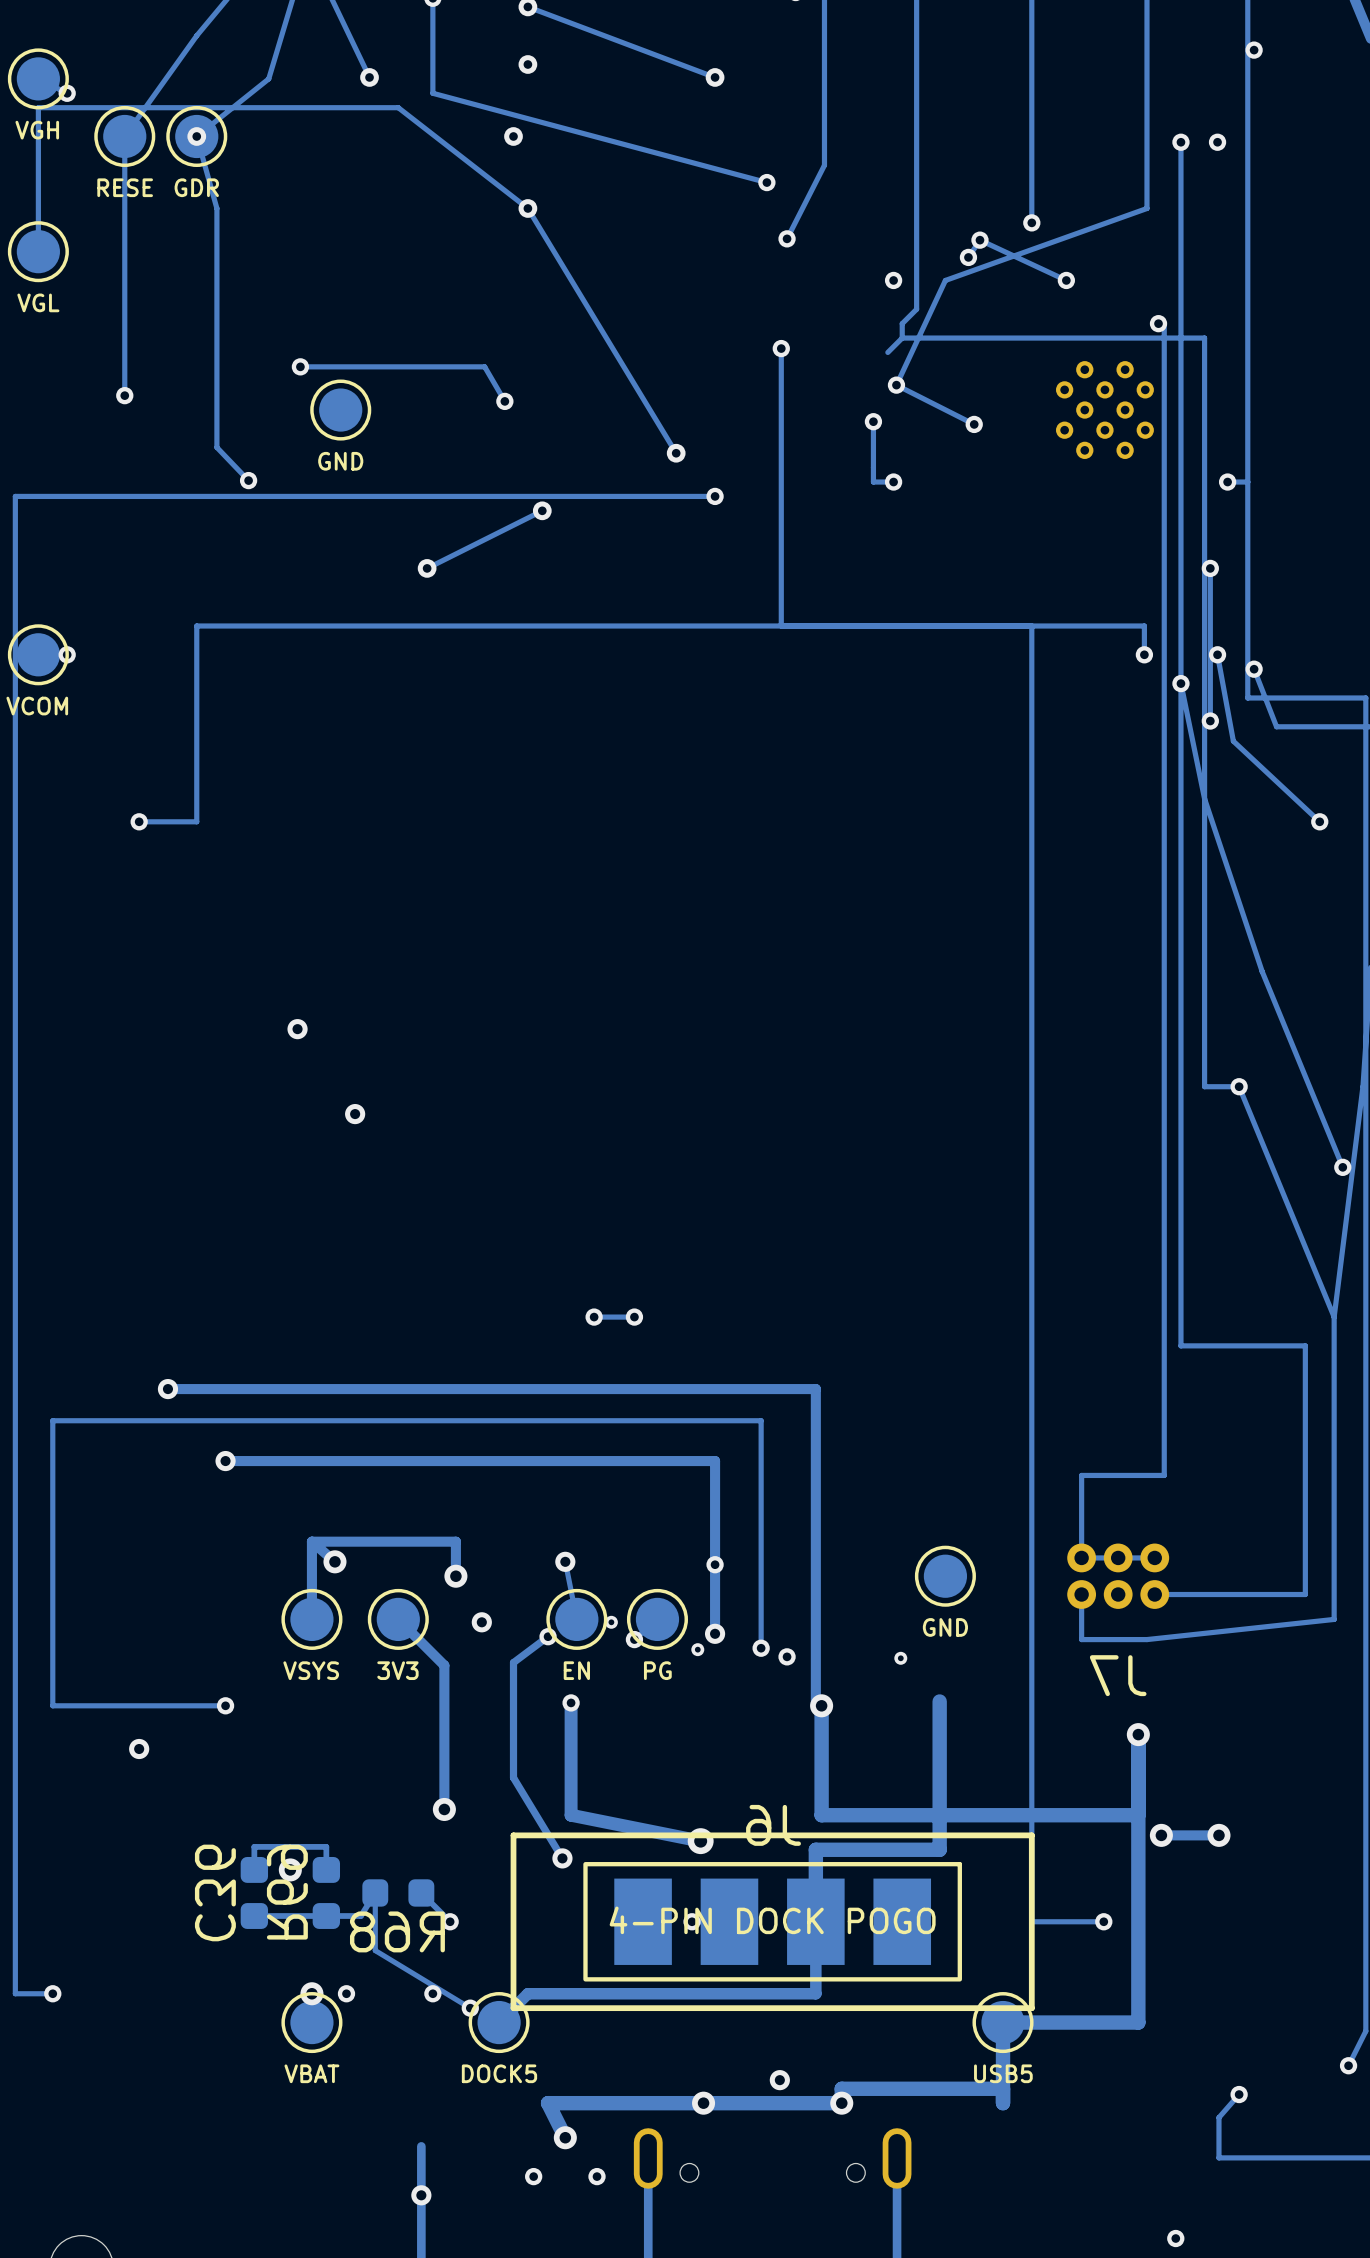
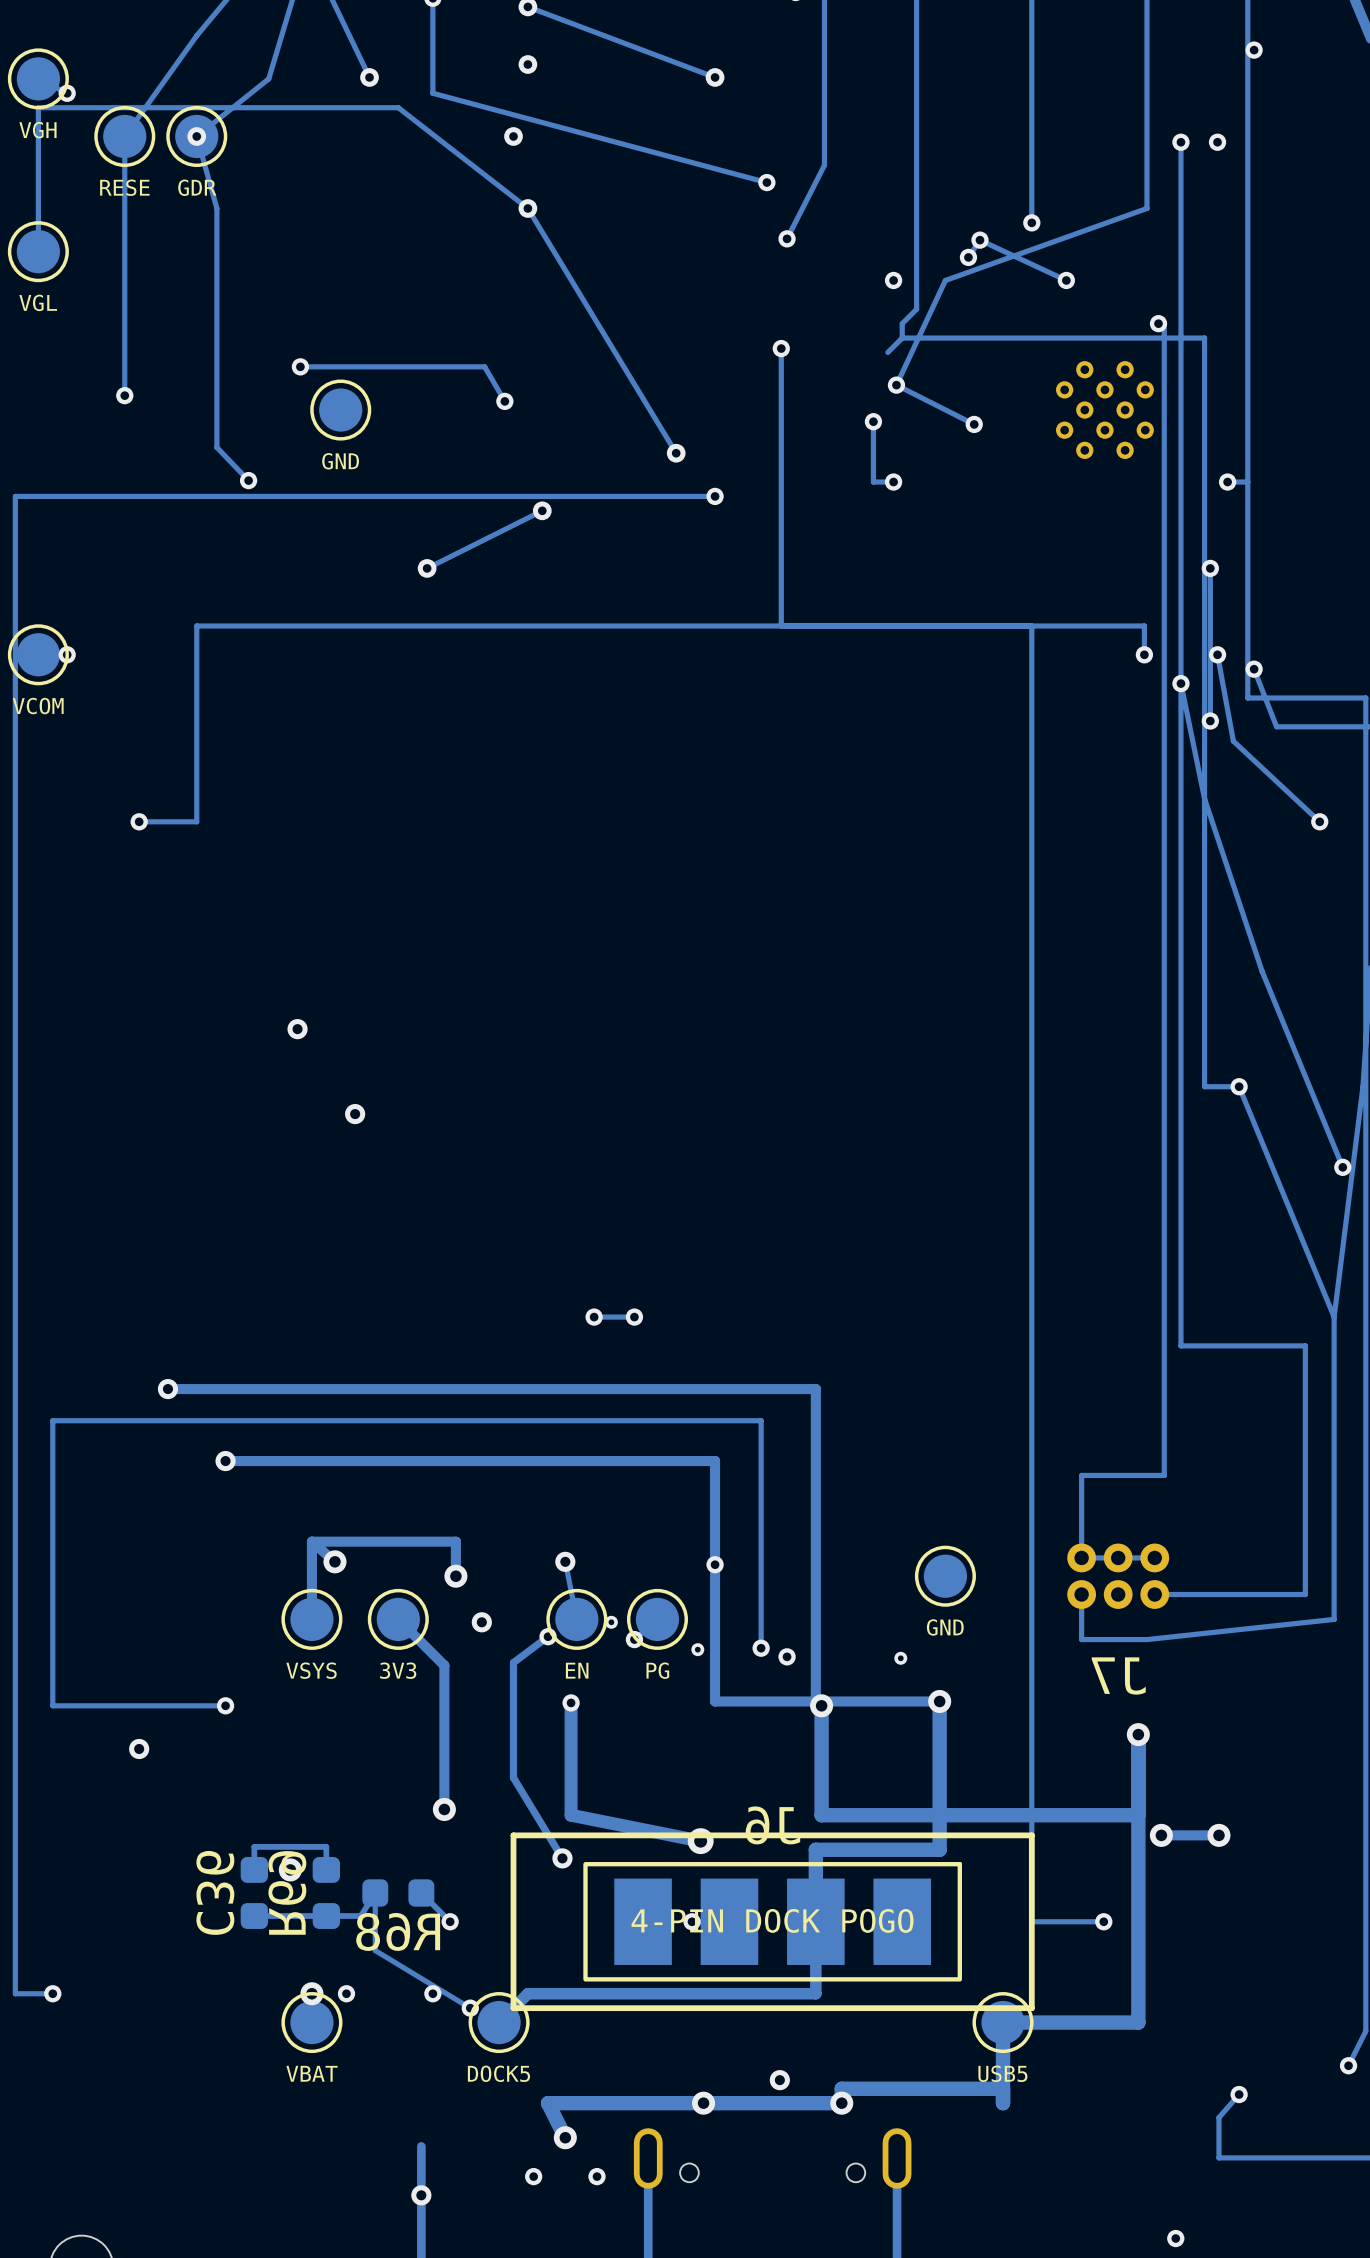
track: none -> (715, 1633) (715, 1701) (939, 1701)
via: (715, 1633) -> none
via: none -> (939, 1701)

